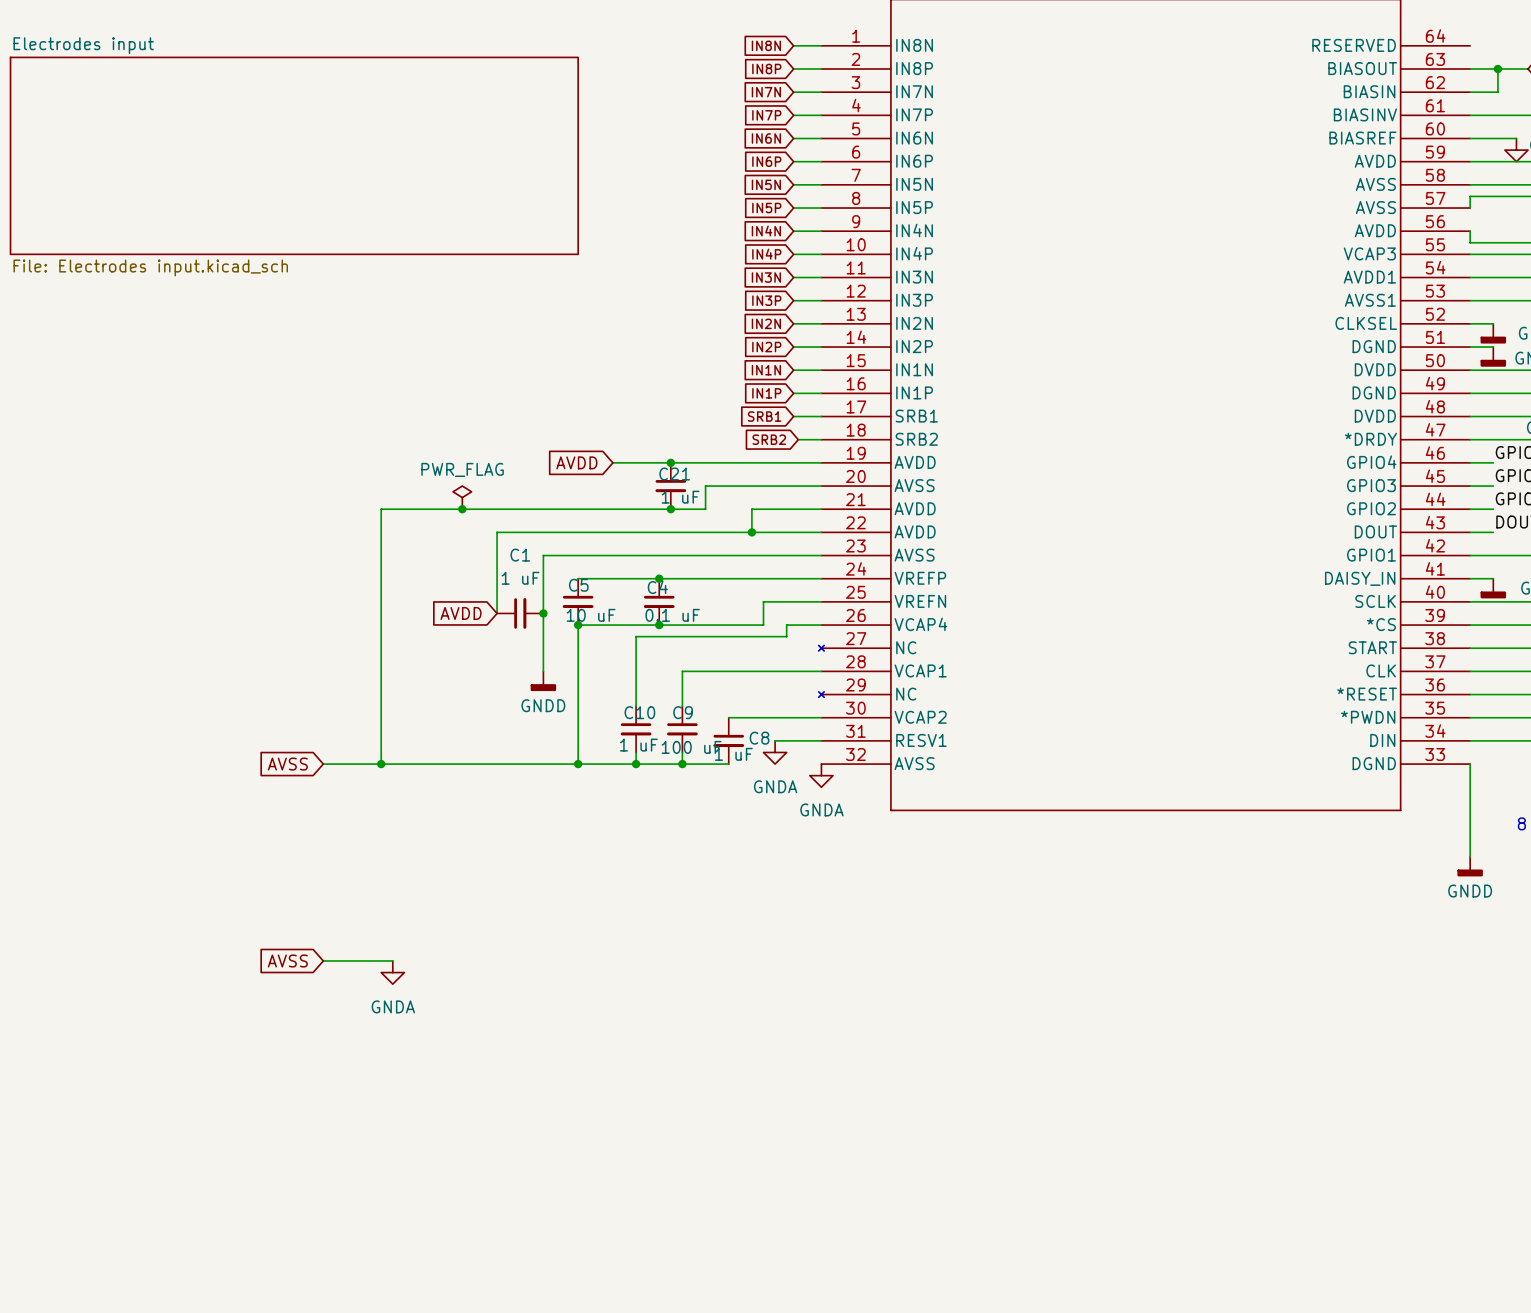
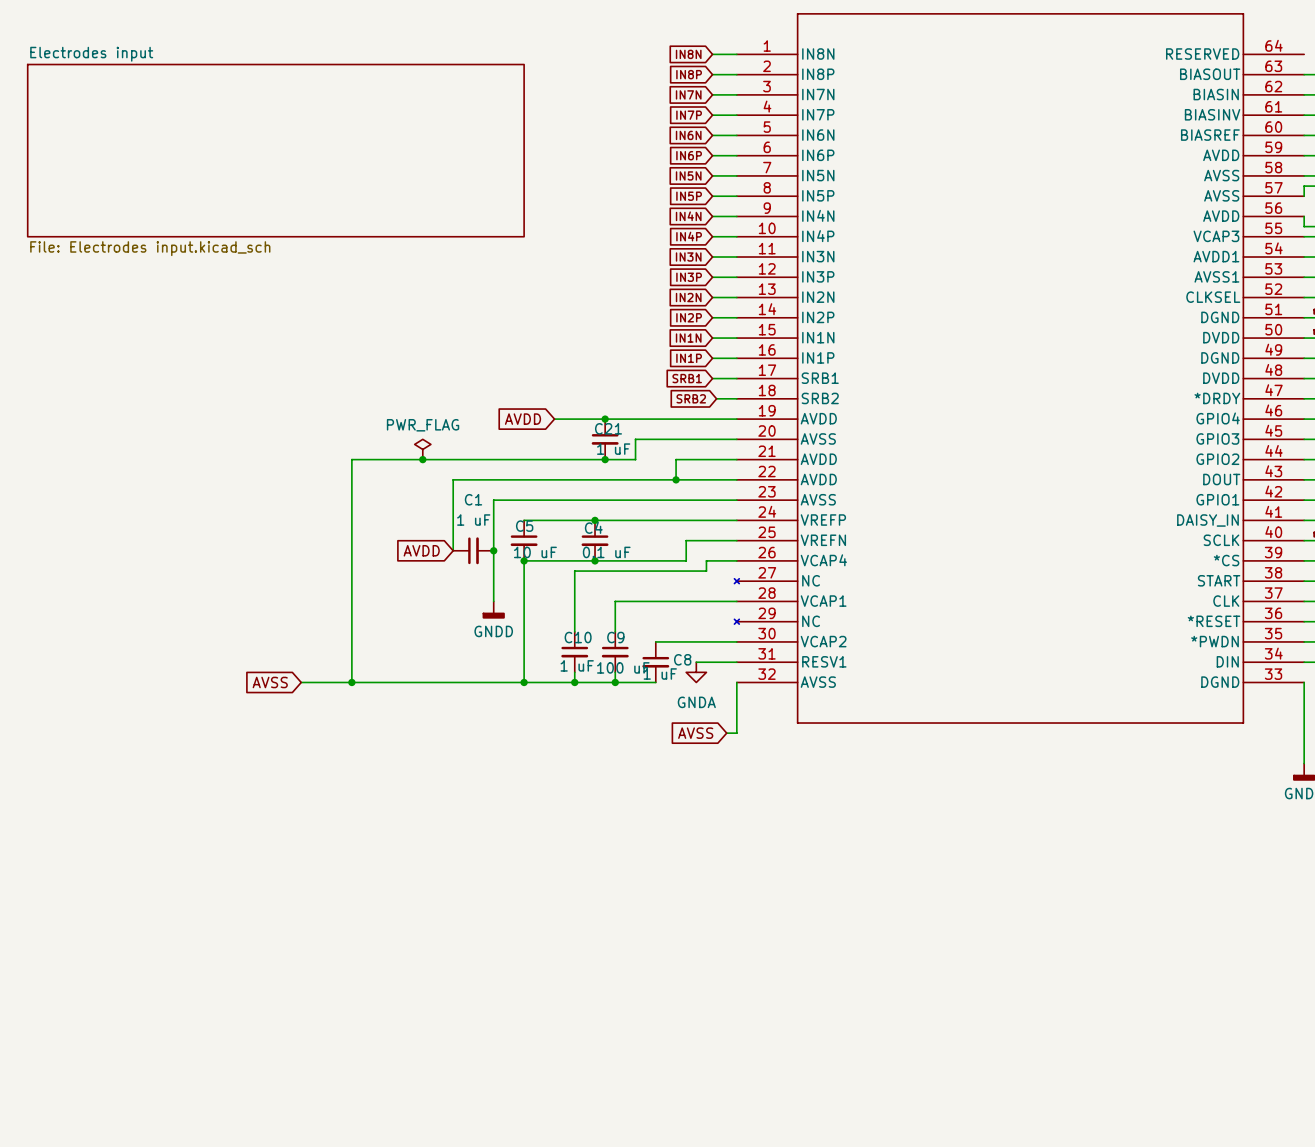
wire: none -> (736, 682) (736, 733) (726, 733)
power symbol: GNDA (821, 775) -> none
global label: none -> AVSS (695, 733)
global label: AVSS (287, 960) -> none
wire: (323, 960) (392, 960) -> none
power symbol: GNDA (392, 972) -> none

